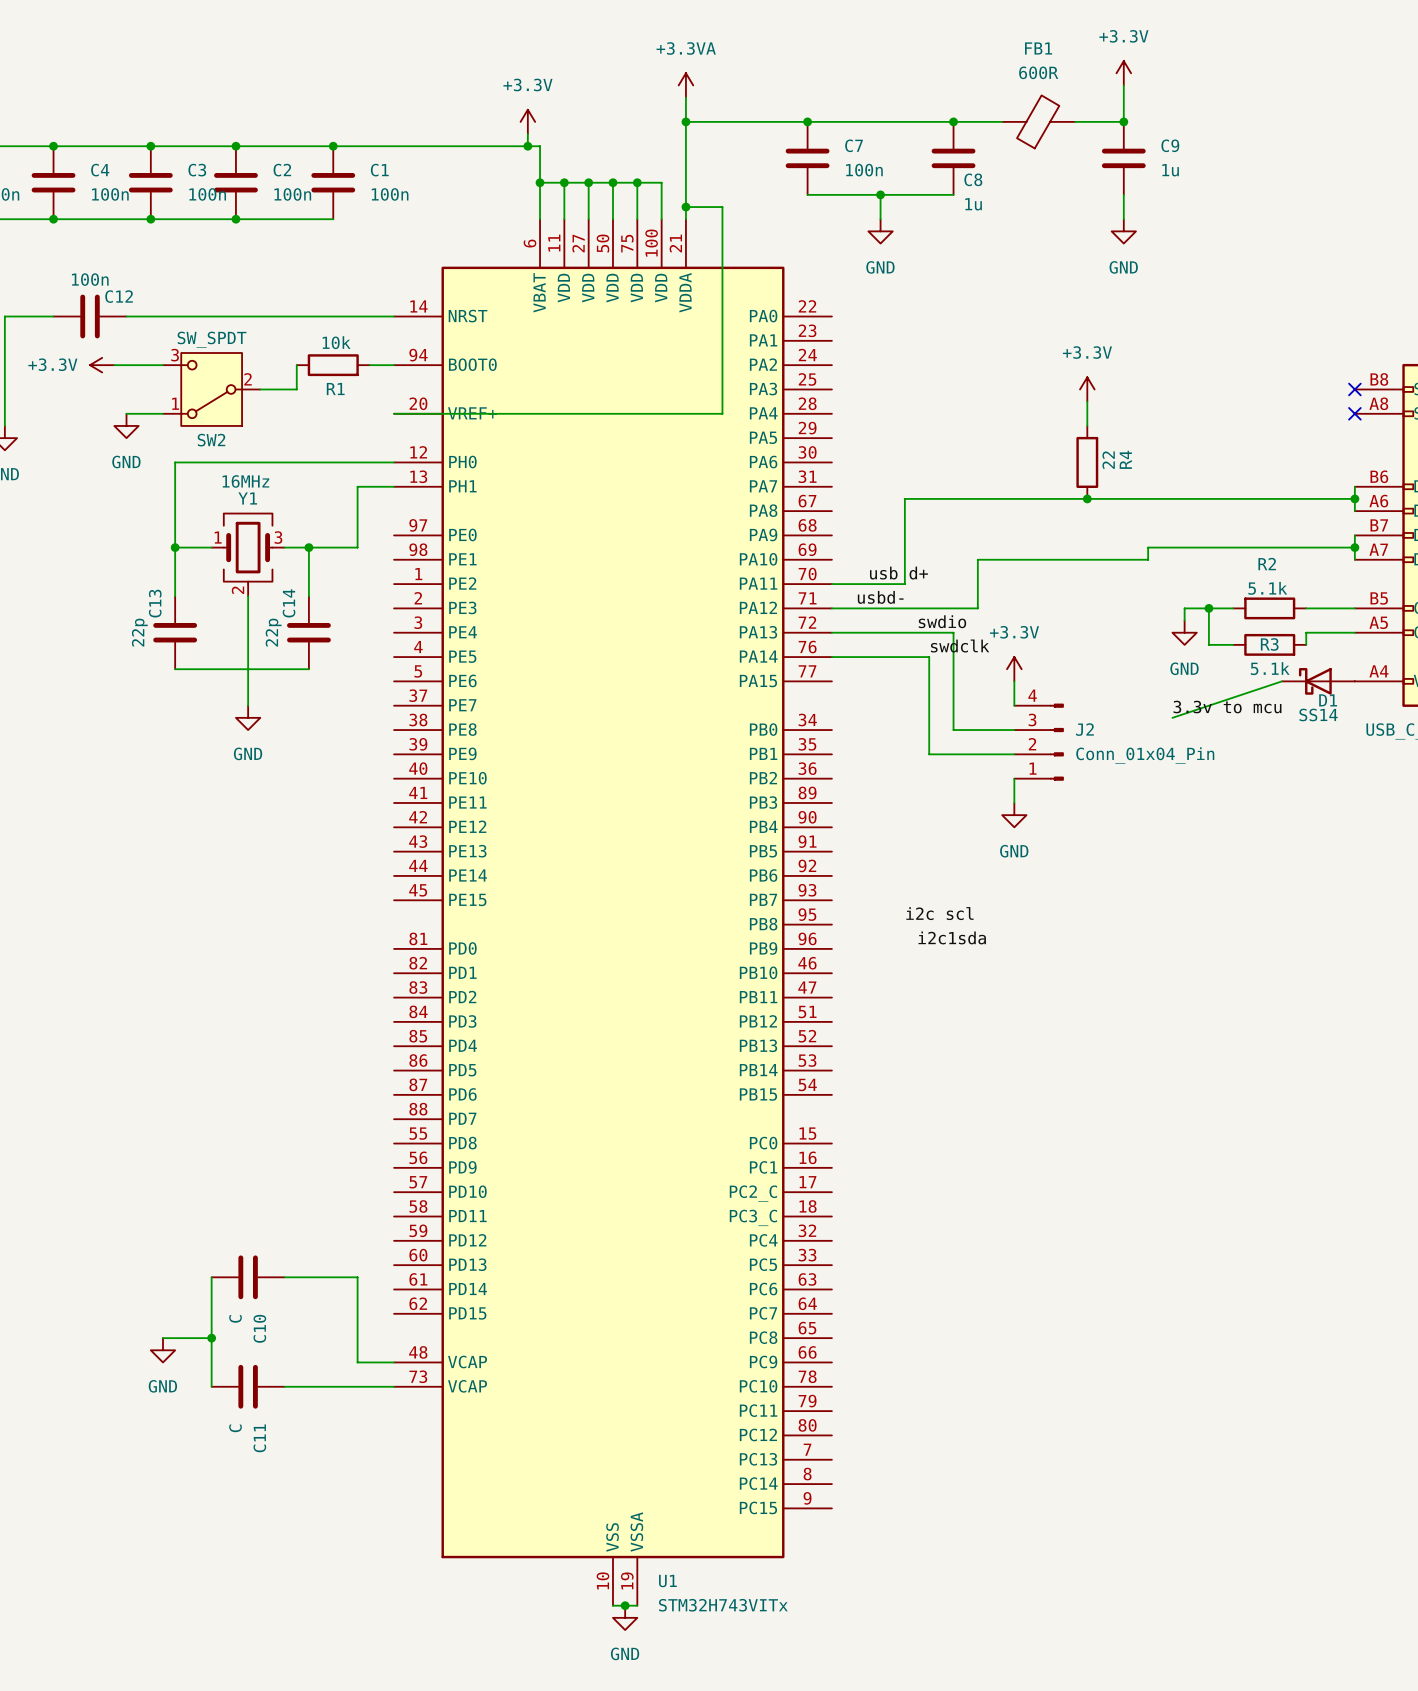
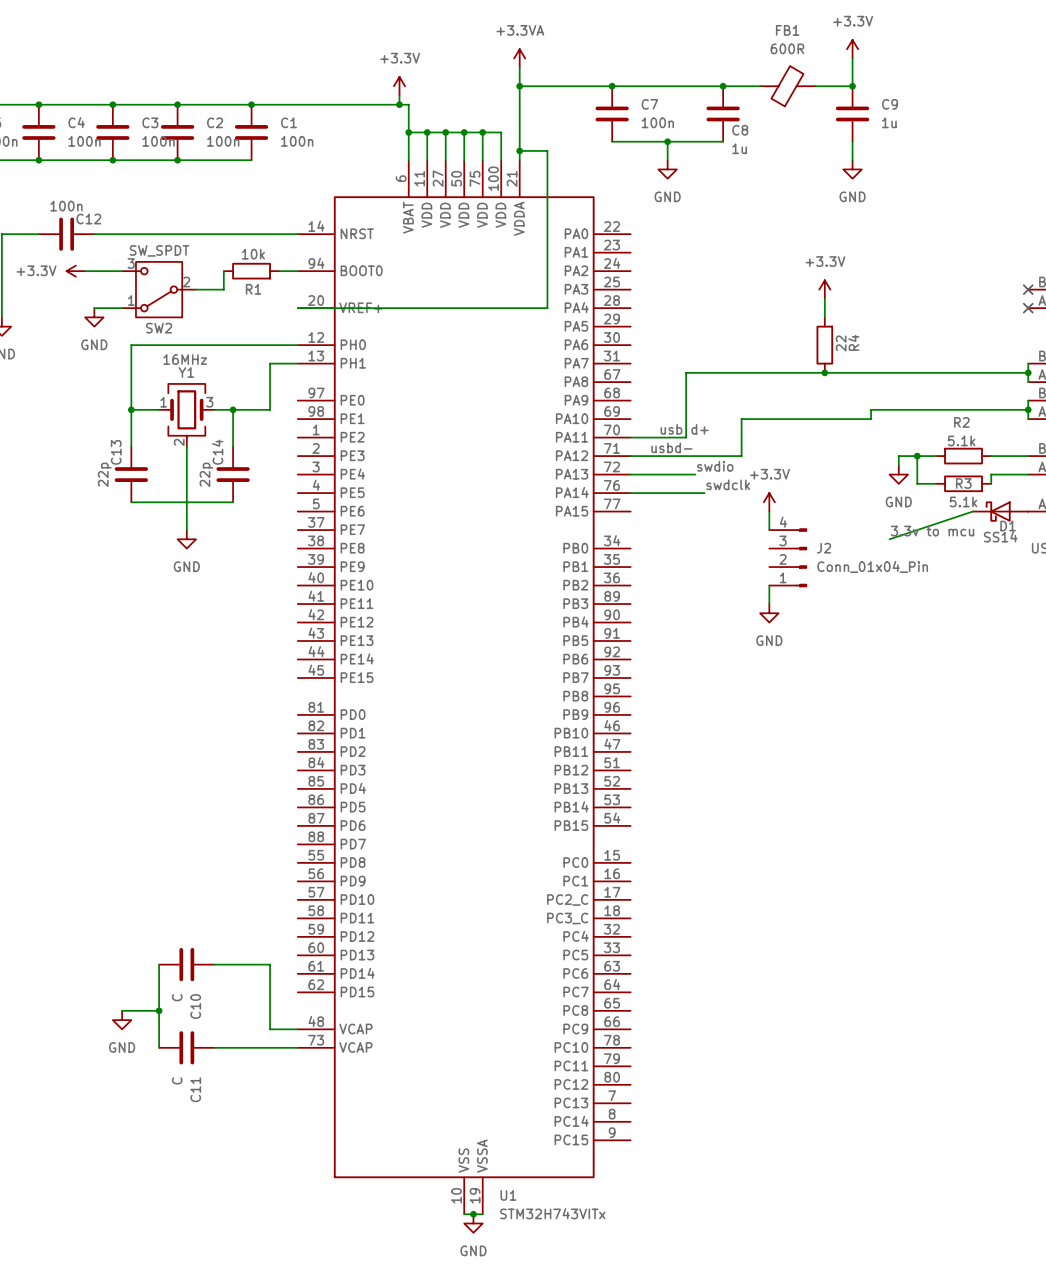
wire: (917, 632) (953, 632) (953, 730) (1014, 730) -> none
wire: (929, 657) (929, 754) (1014, 754) -> none
label: i2c scl (939, 913) -> none
label: i2c1sda (952, 937) -> none

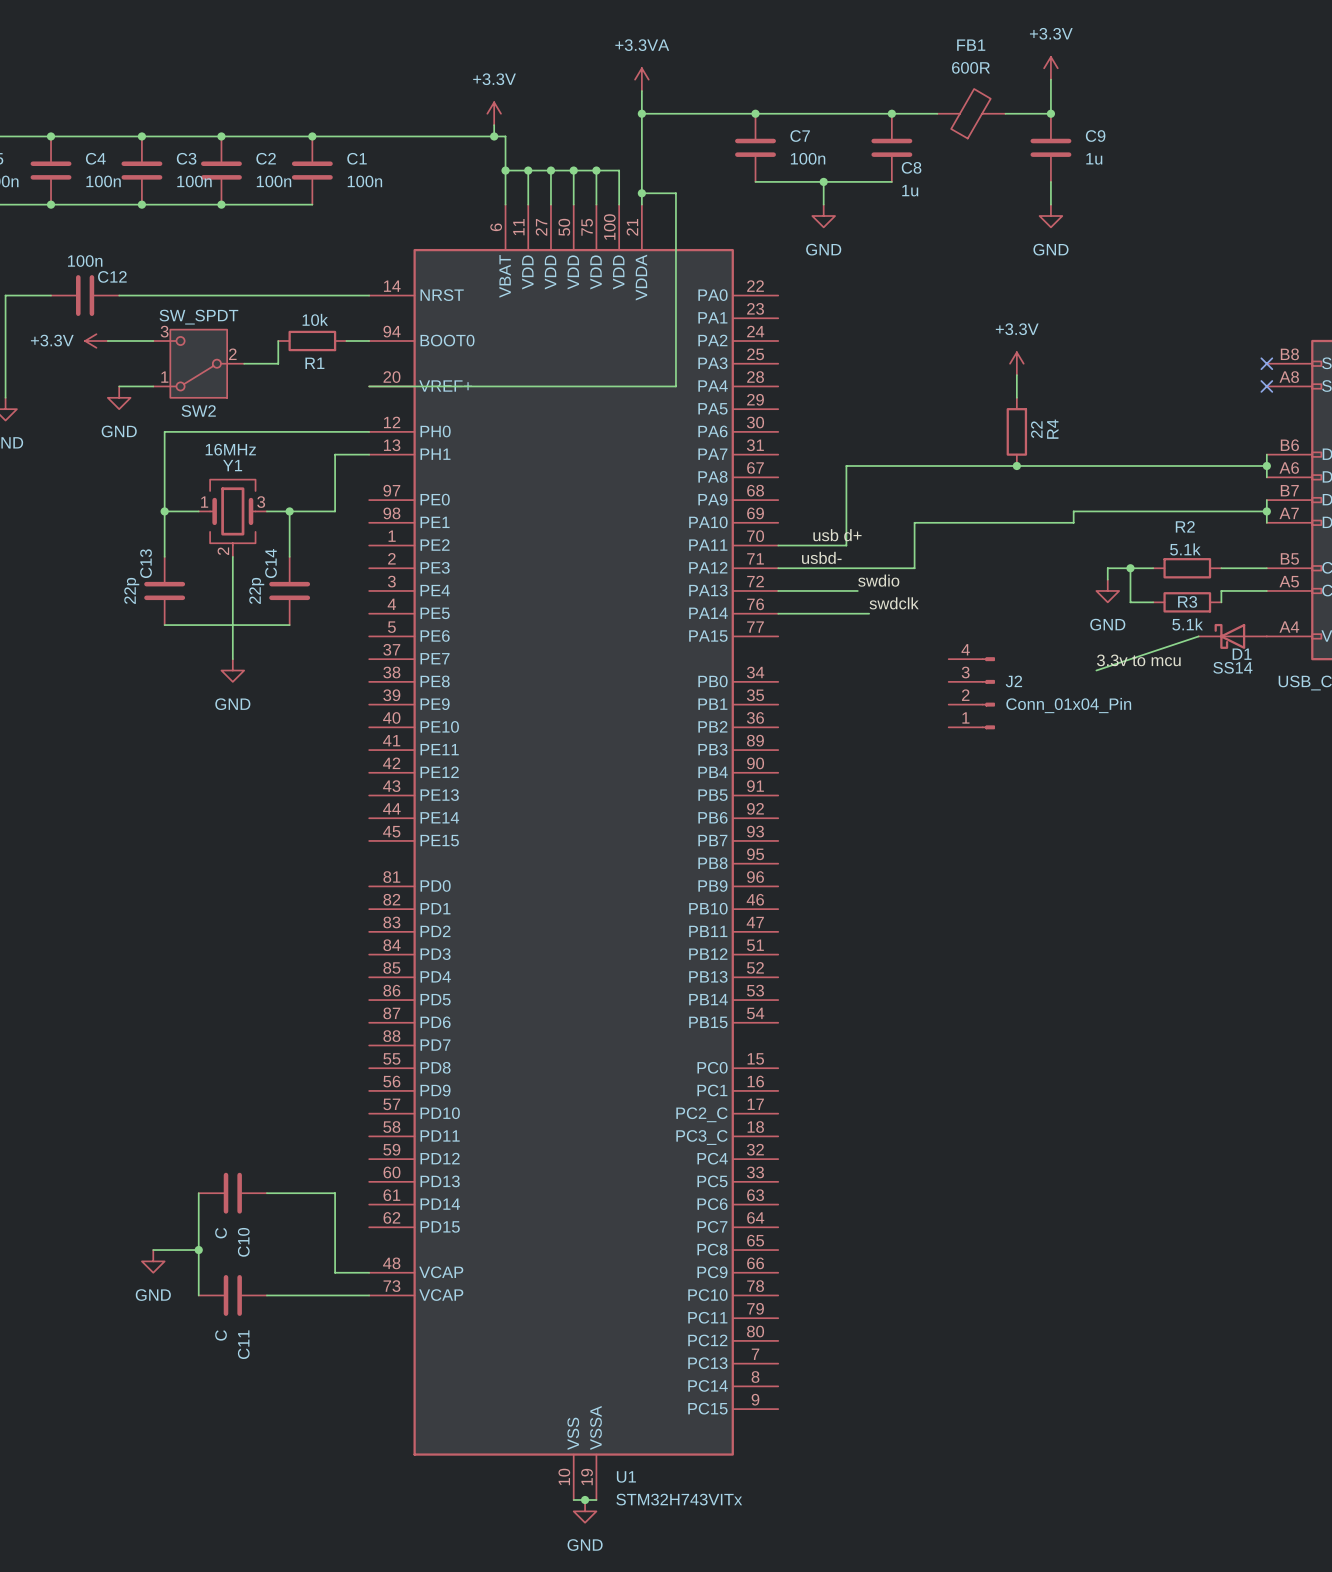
power symbol: +3.3V (769, 502) -> none
wire: (769, 511) (769, 530) -> none
wire: (769, 585) (769, 604) -> none
power symbol: GND (769, 613) -> none

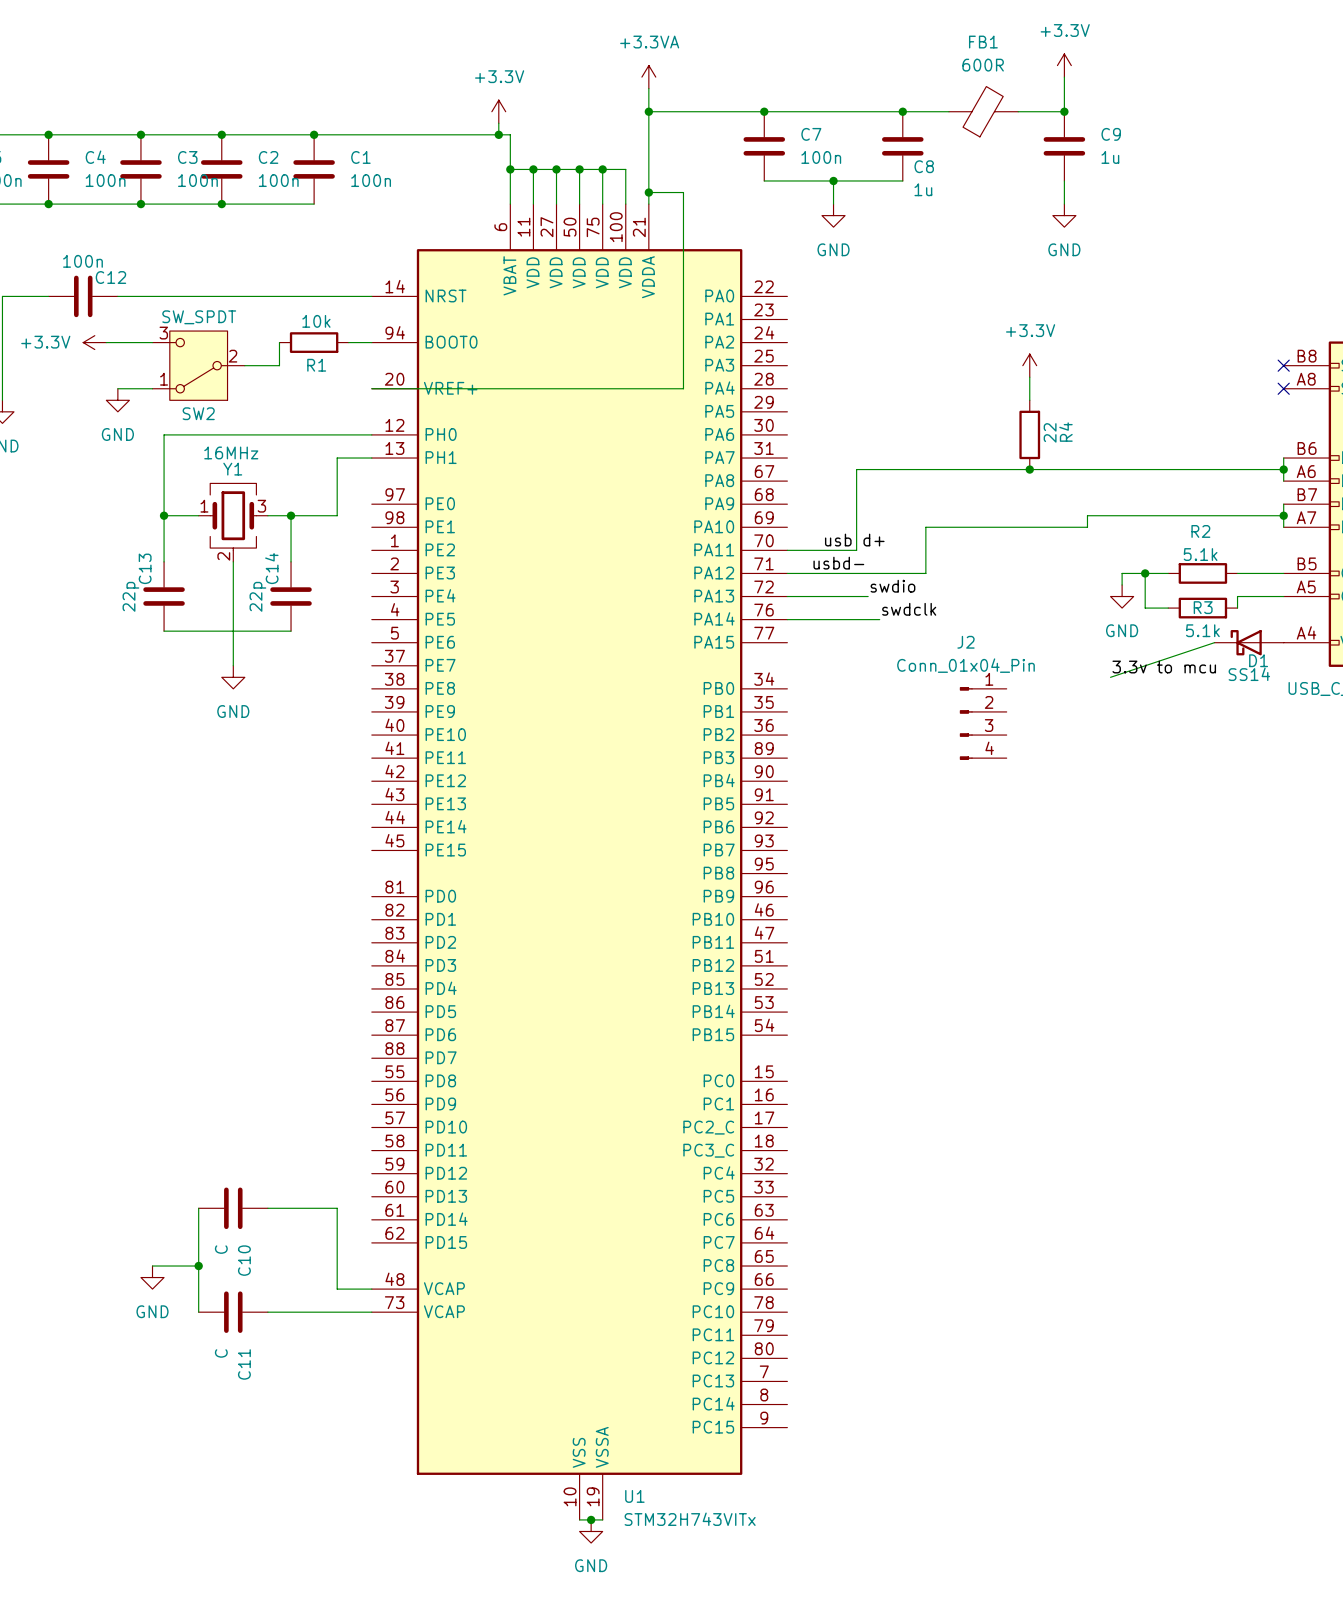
J2 name position: J2 (1013, 681) -> J2 (966, 642)
J2 rotation: 0° (988, 693) -> 180° (966, 723)
J2 value position: Conn_01x04_Pin (1068, 705) -> Conn_01x04_Pin (966, 665)

